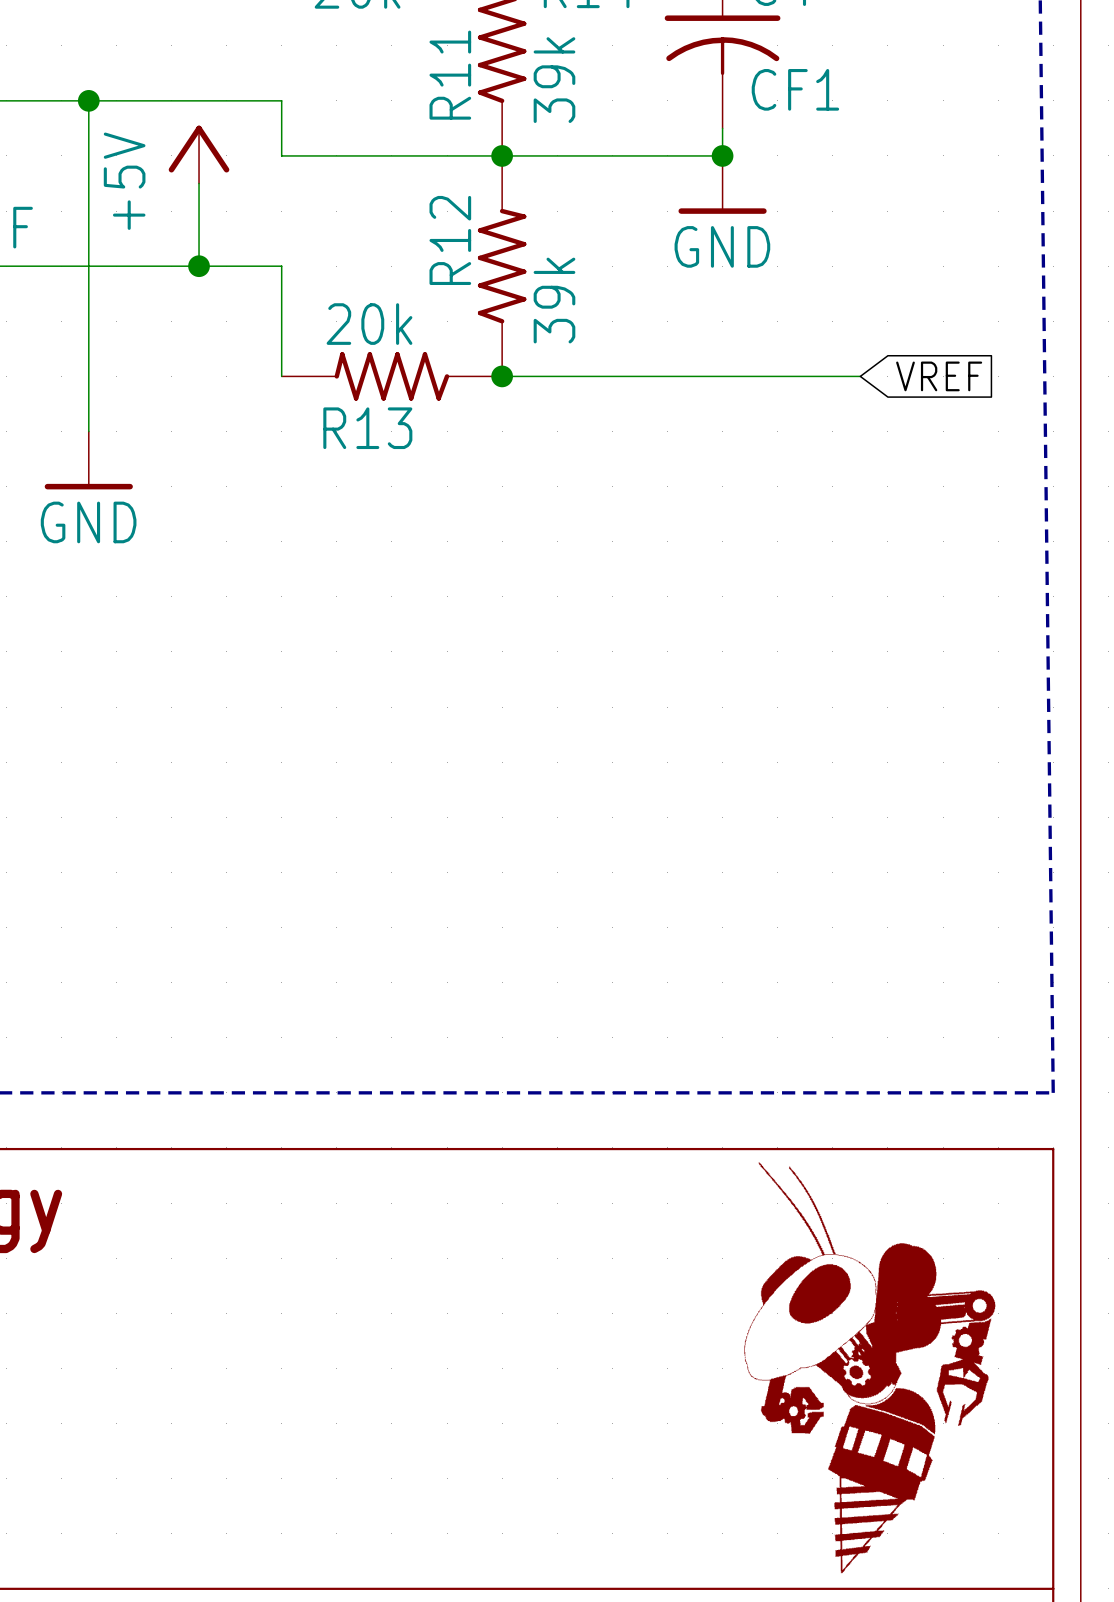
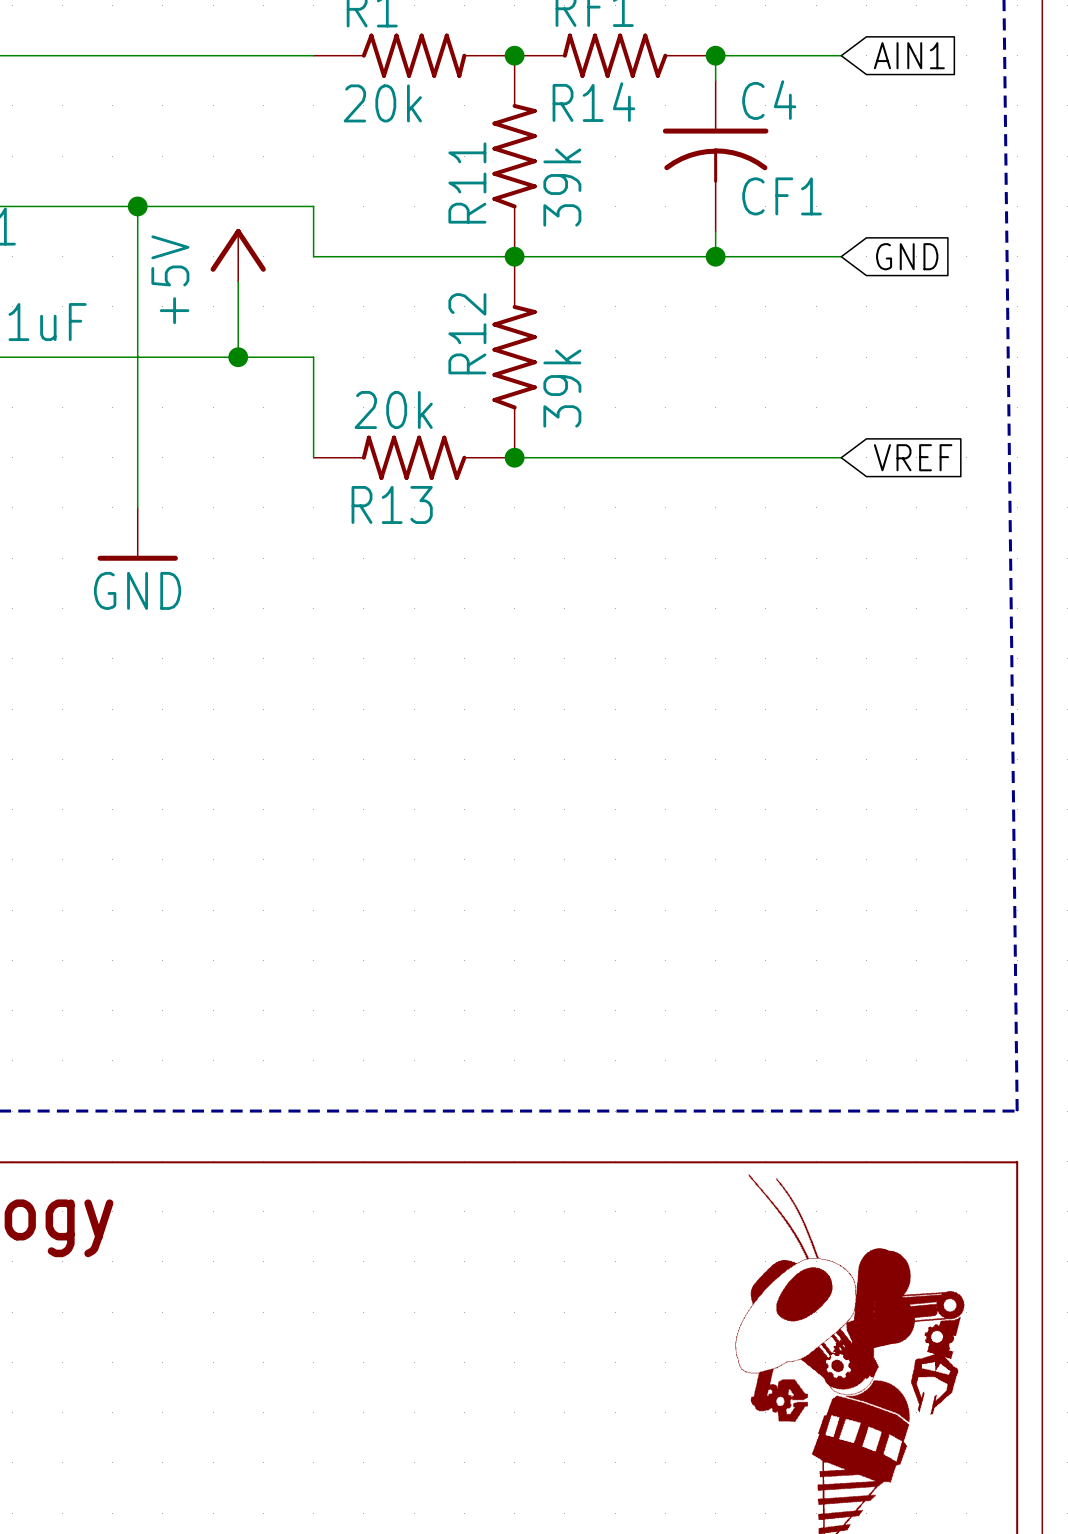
wire: none -> (715, 256) (841, 256)
global label: none -> GND (907, 256)
power symbol: GND (722, 184) -> none

